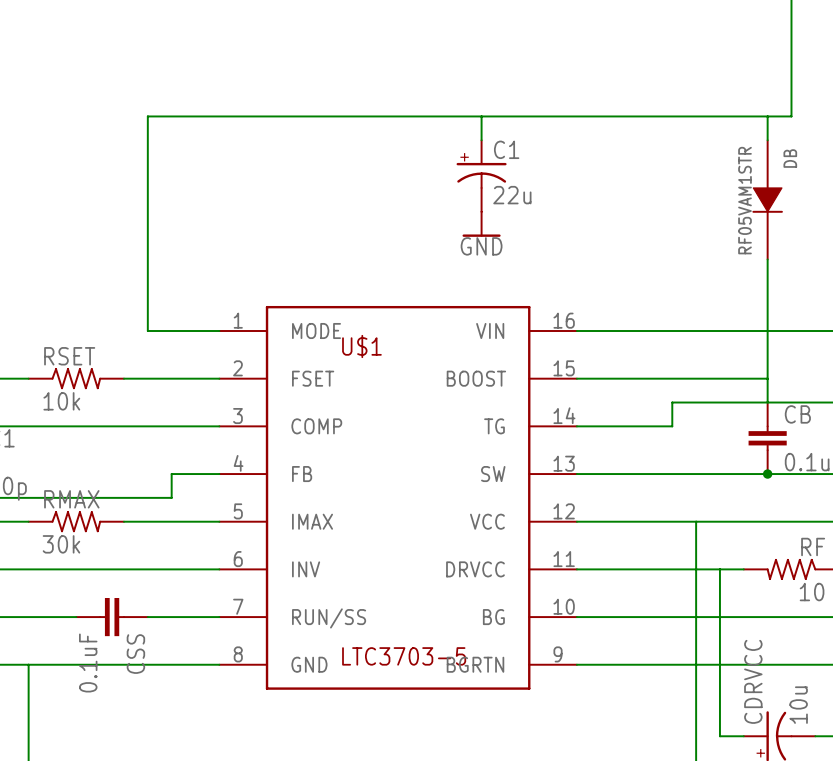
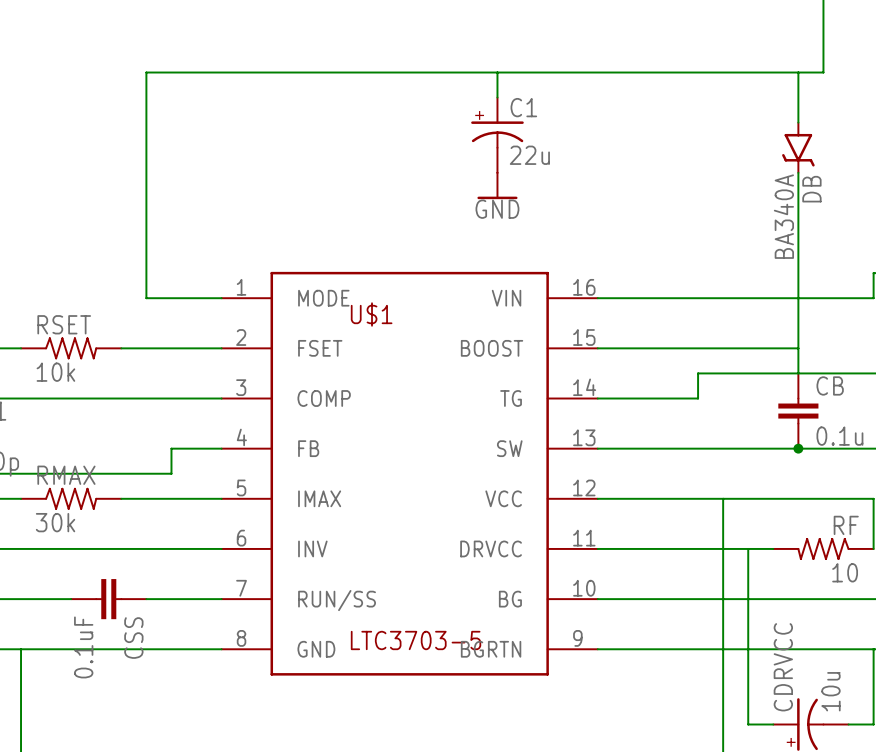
DB: none -> BA340A (798, 147)
DB: RF05VAM1STR (767, 199) -> none

